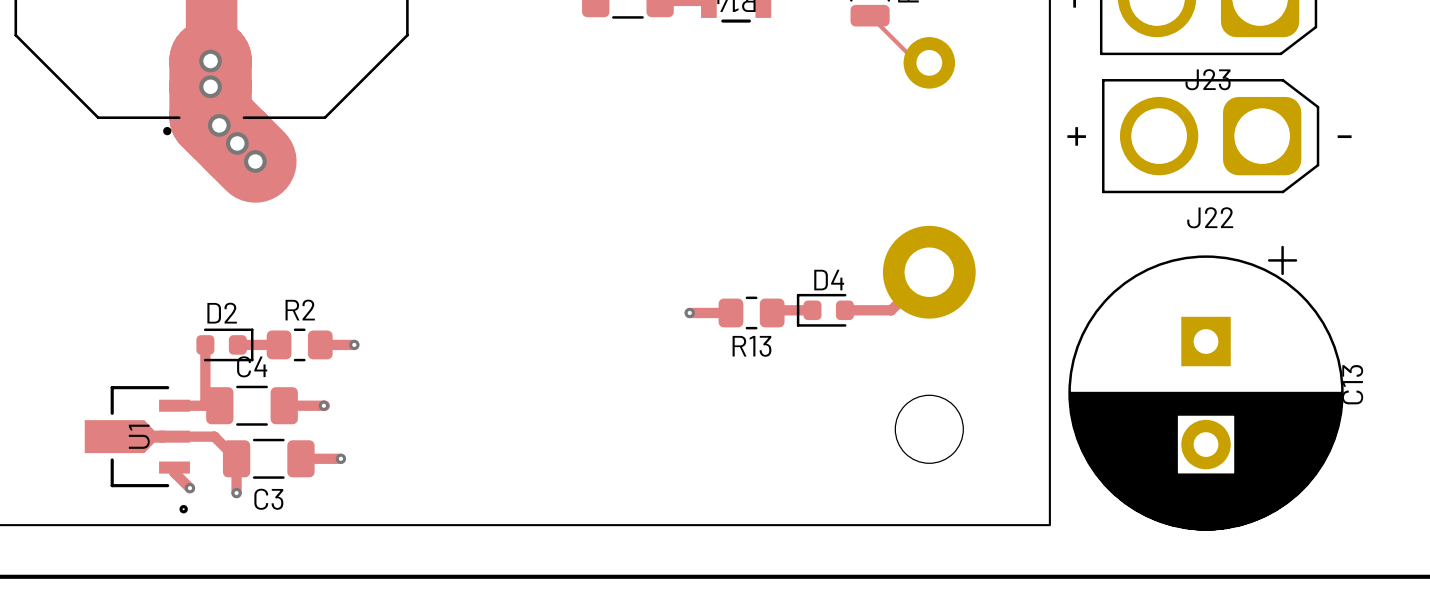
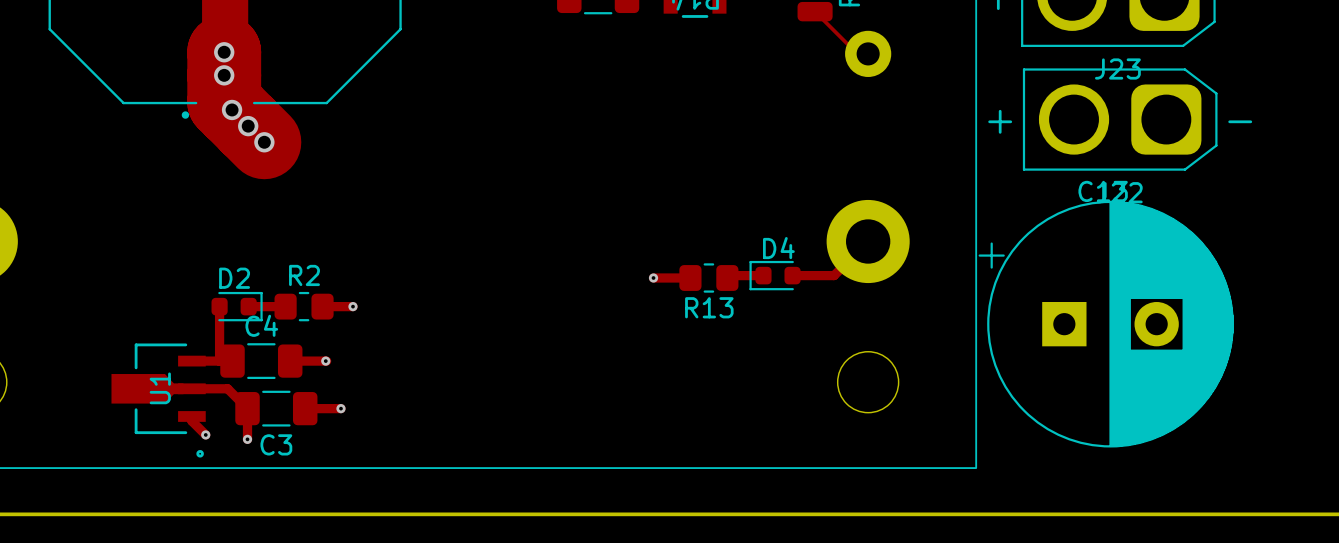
C13 rotation: 0° (1206, 388) -> 90° counterclockwise (1106, 324)

